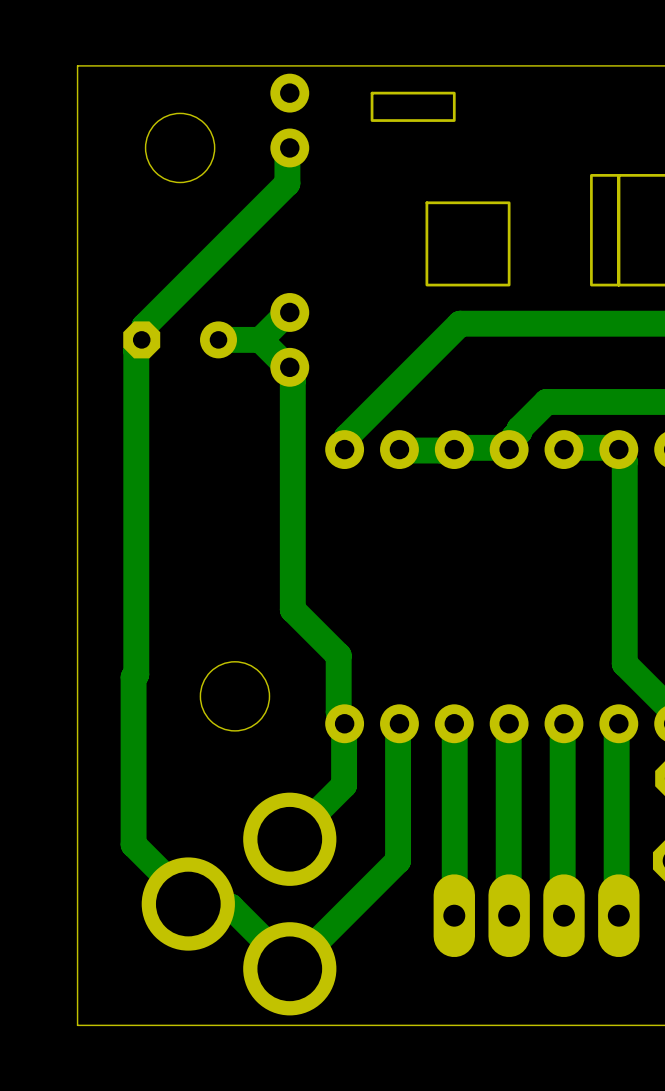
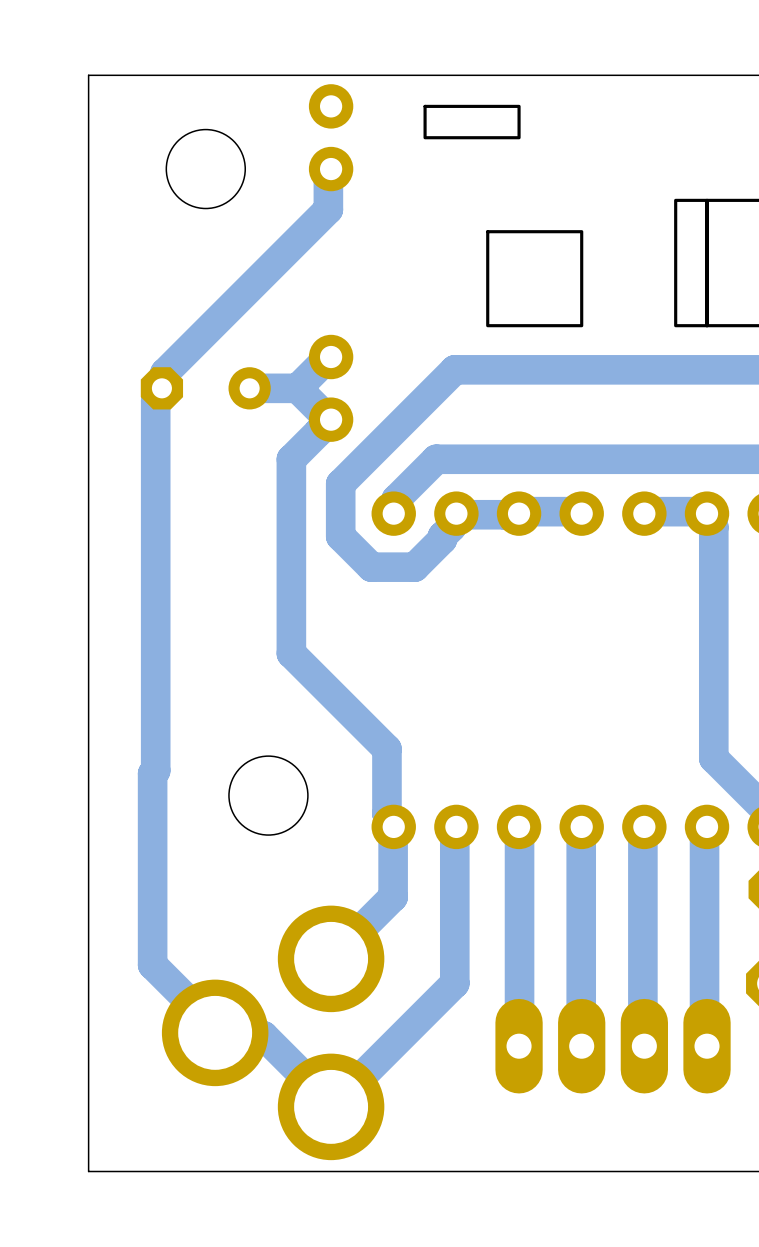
track: (460, 323) (381, 401) -> (525, 369) (454, 369) (340, 483) (340, 536) (371, 567) (414, 567) (442, 539) (442, 536) (451, 527) (456, 513)
track: (289, 367) (292, 380) (292, 609) -> (331, 419) (291, 459) (291, 653) (334, 696)
track: (546, 401) (519, 428) (509, 449) -> (624, 459) (436, 459)

